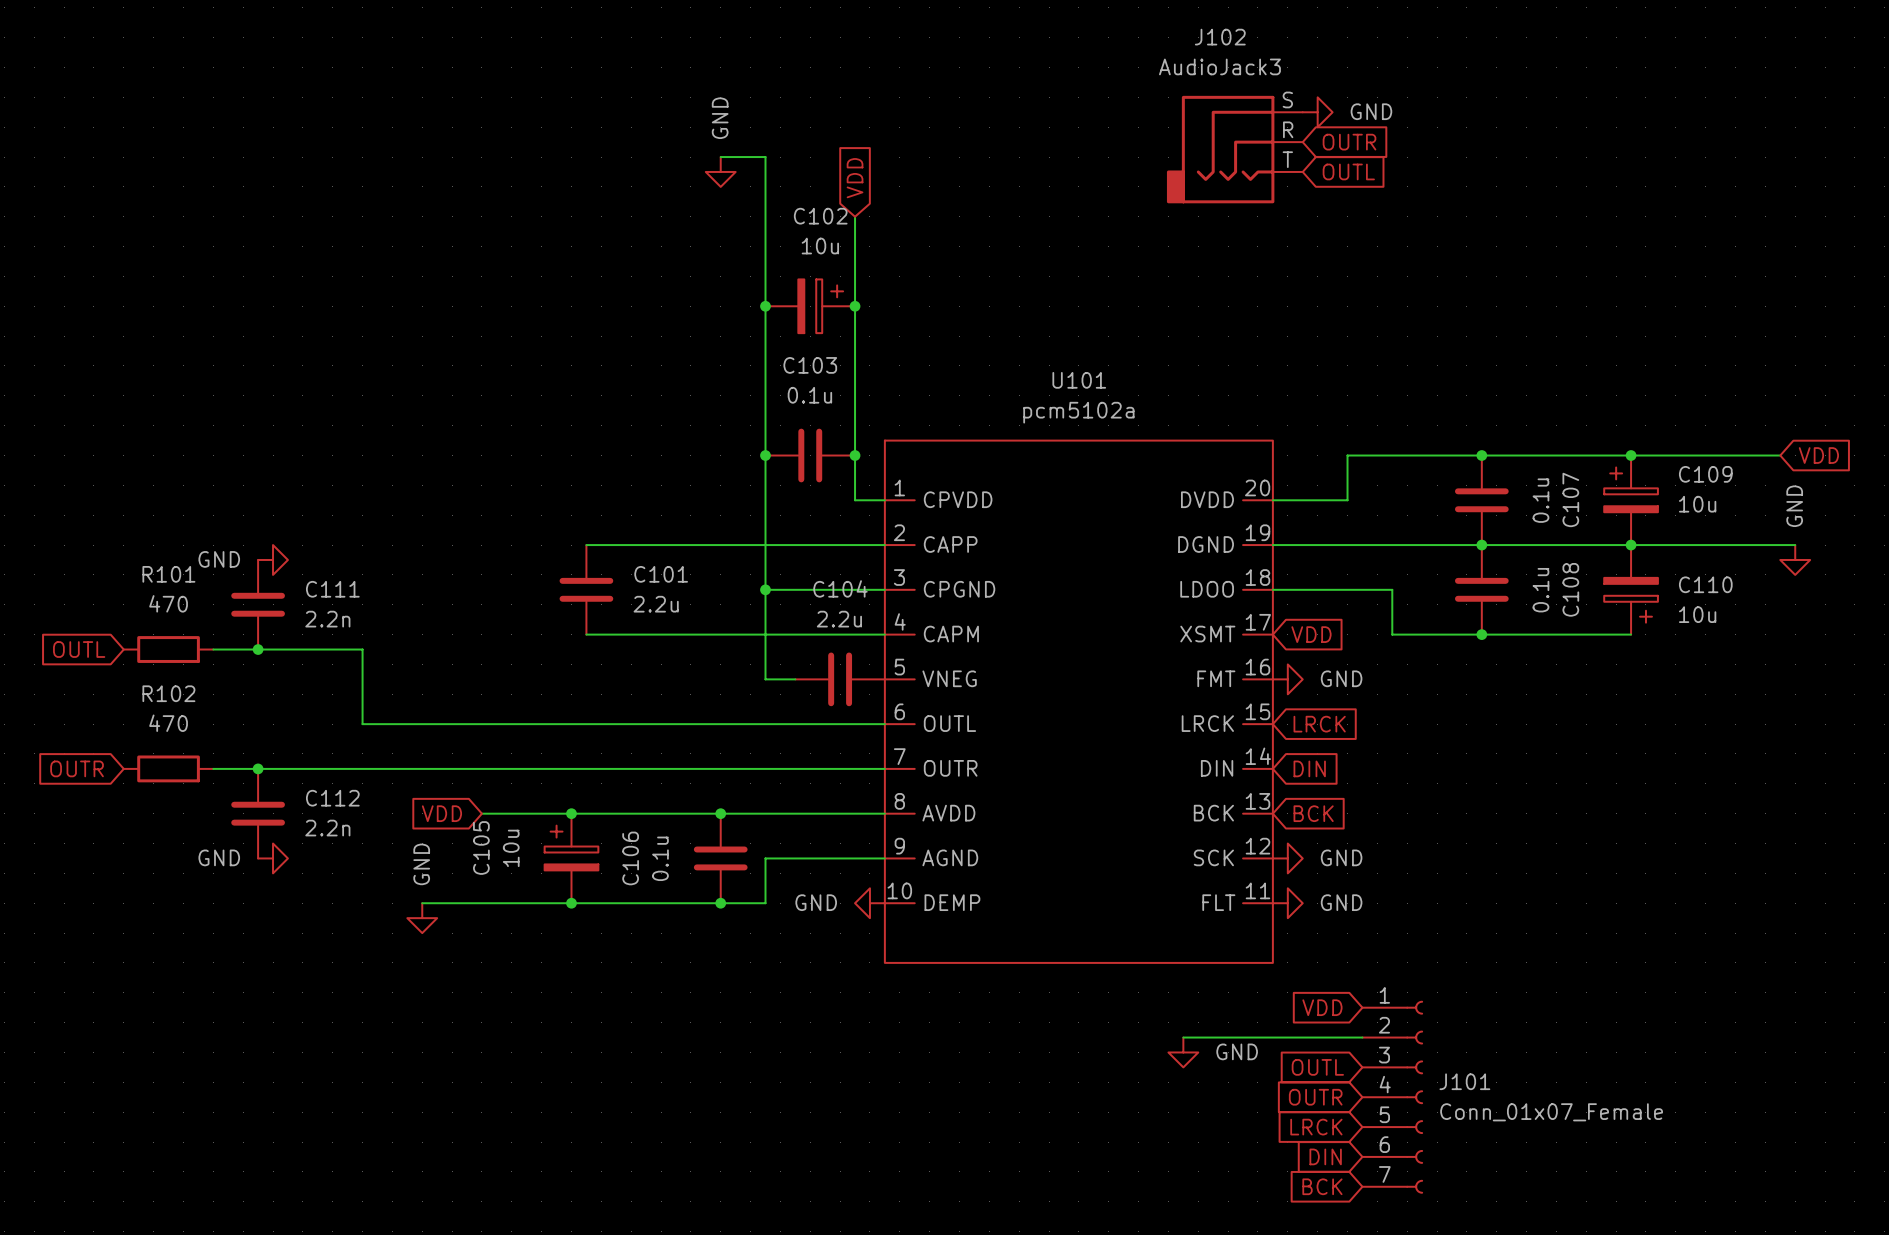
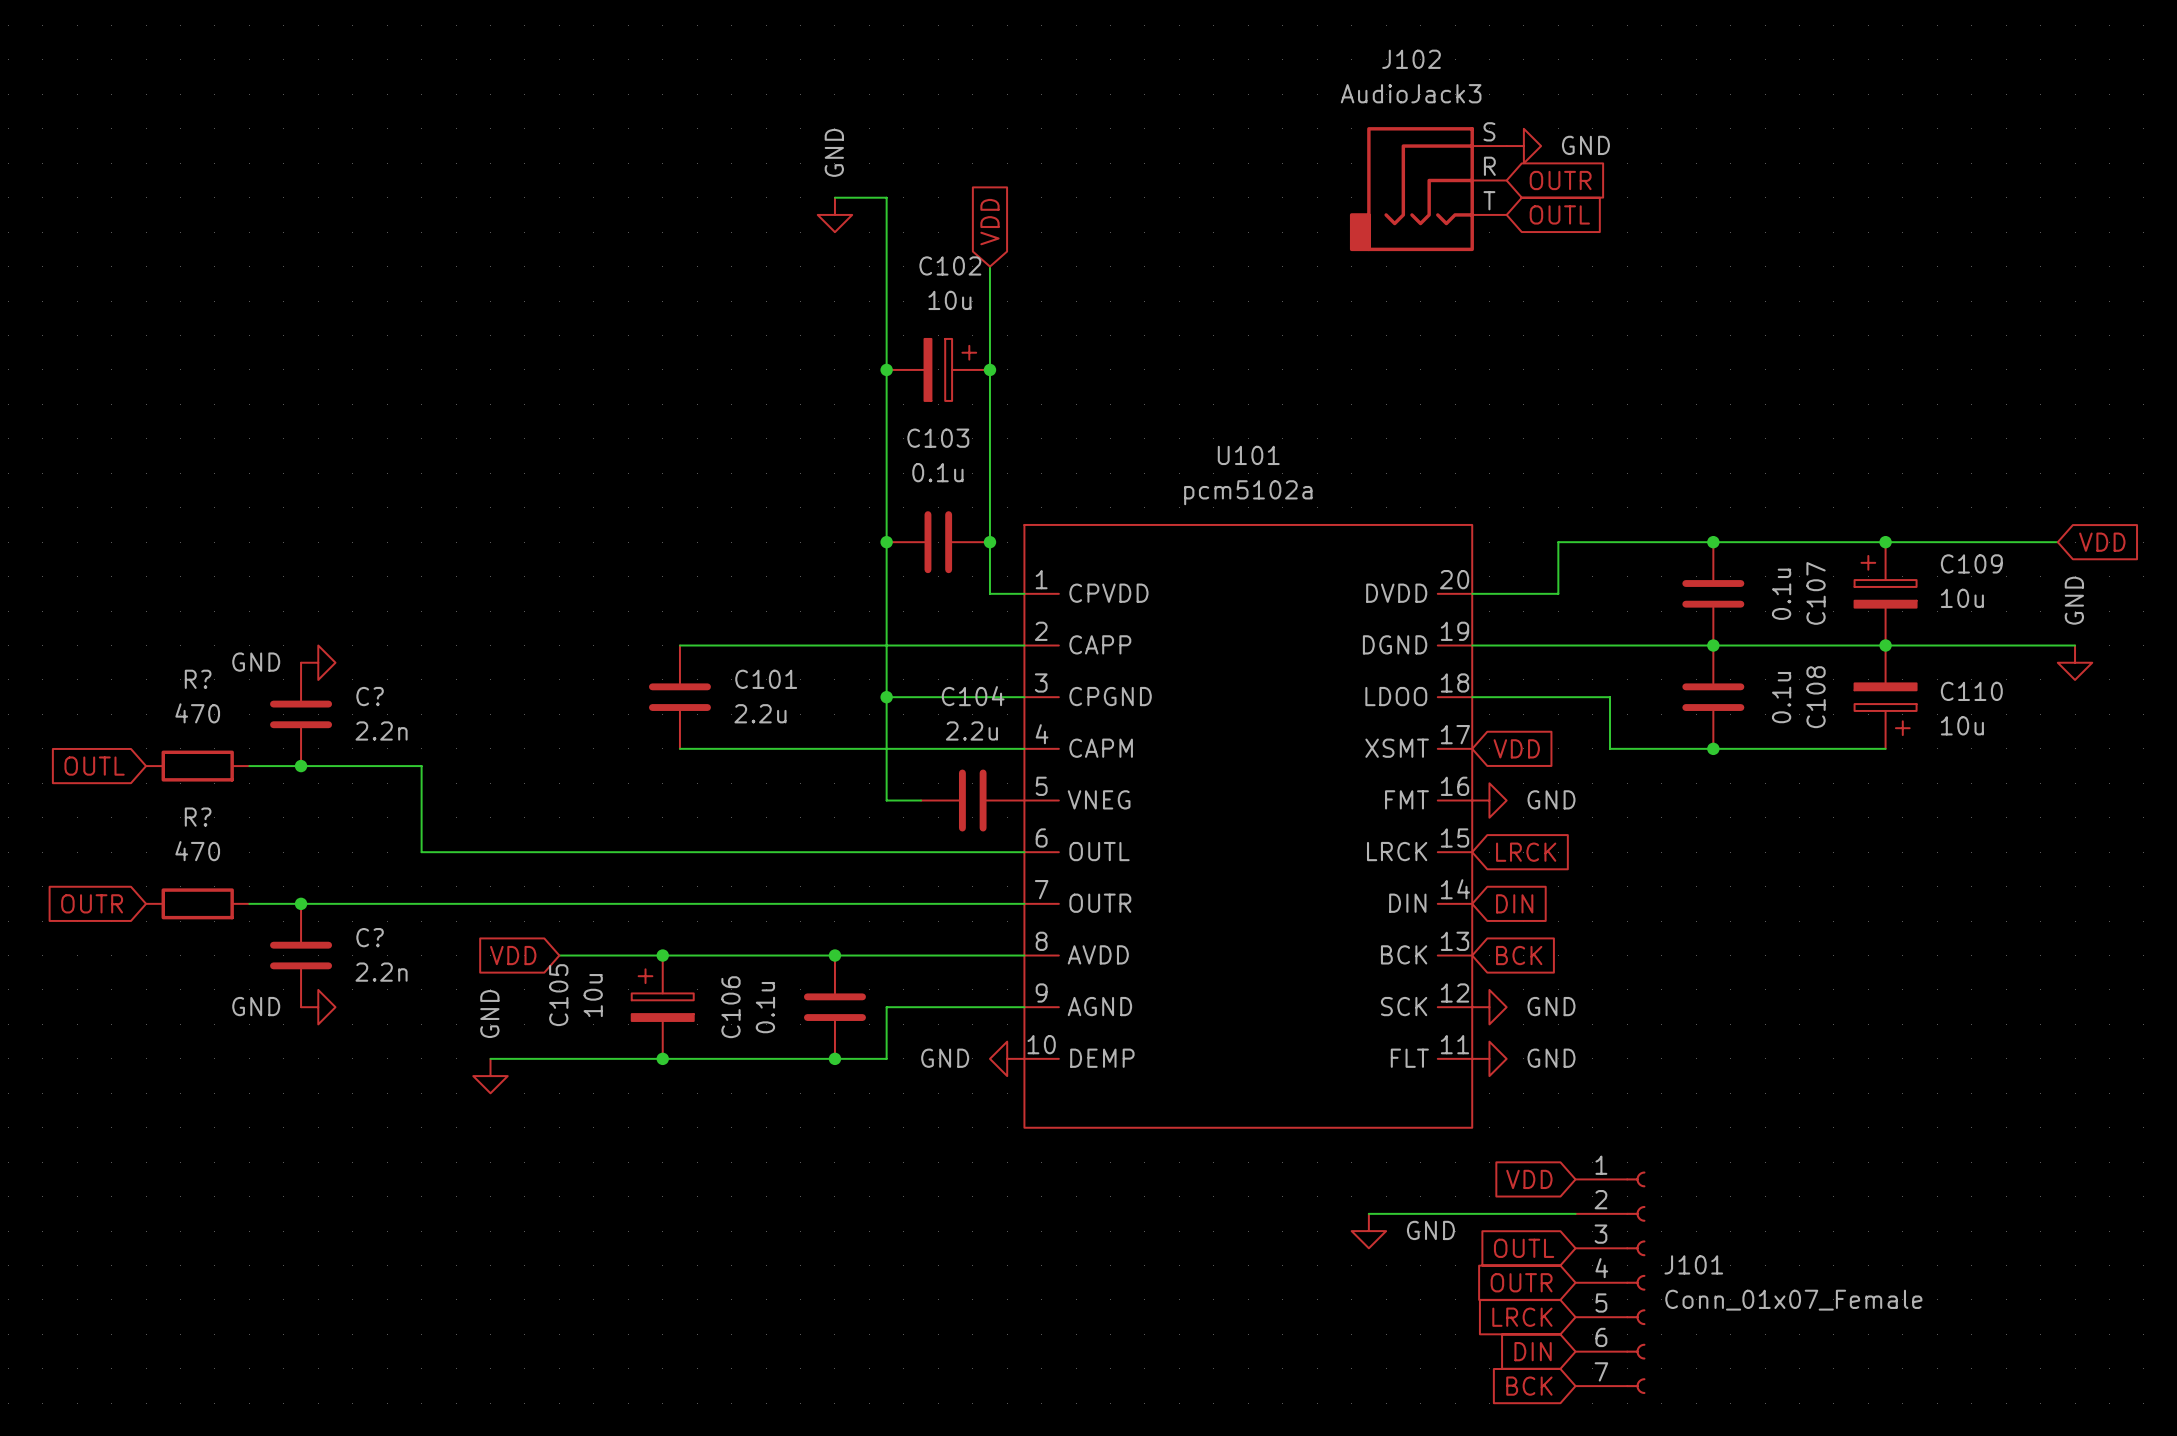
R101 name: R101 (168, 574) -> R? (198, 679)
C111 name: C111 (332, 589) -> C? (370, 696)
R102 name: R102 (168, 693) -> R? (198, 817)
C112 name: C112 (332, 798) -> C? (370, 937)

